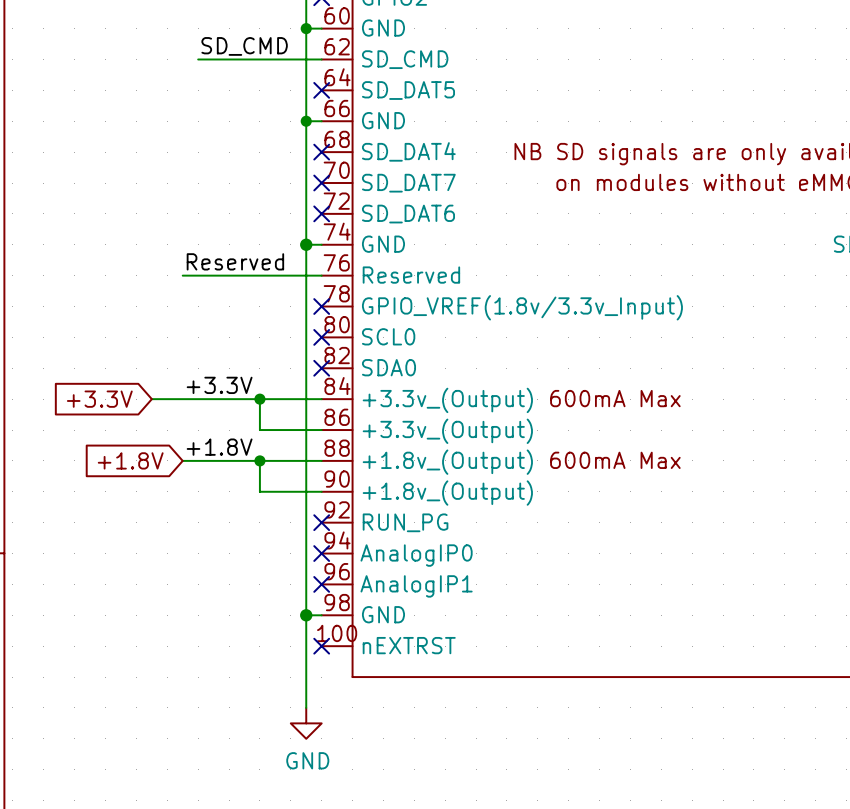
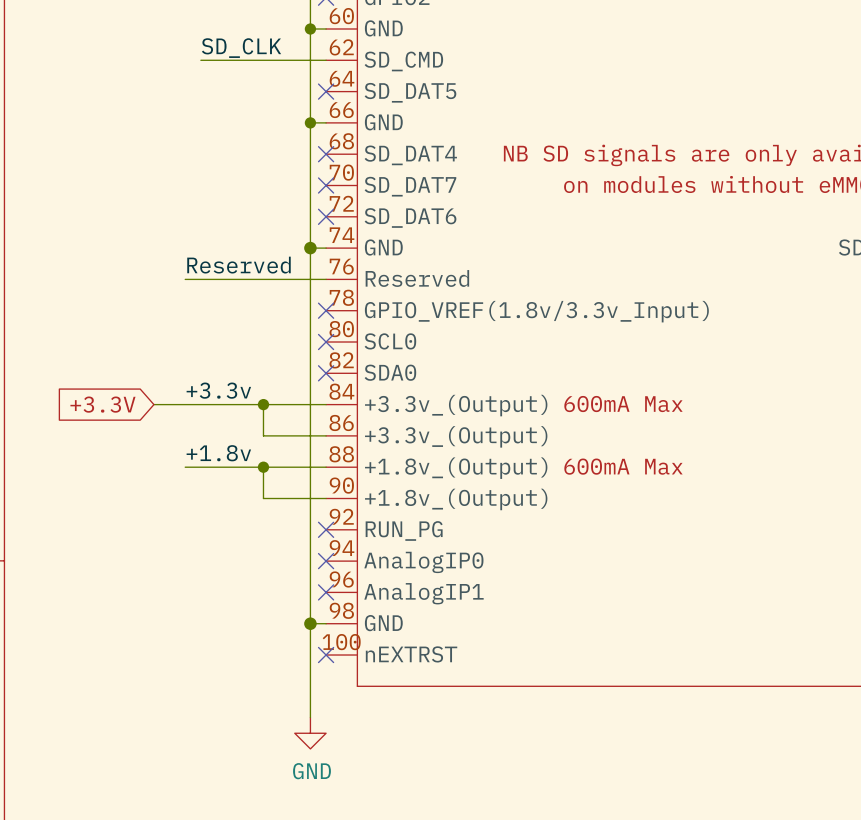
label: SD_CMD (244, 46) -> SD_CLK (241, 48)
label: +3.3V (219, 385) -> +3.3v (218, 390)
label: +1.8V (219, 447) -> +1.8v (218, 453)
global label: +1.8V (130, 460) -> none

